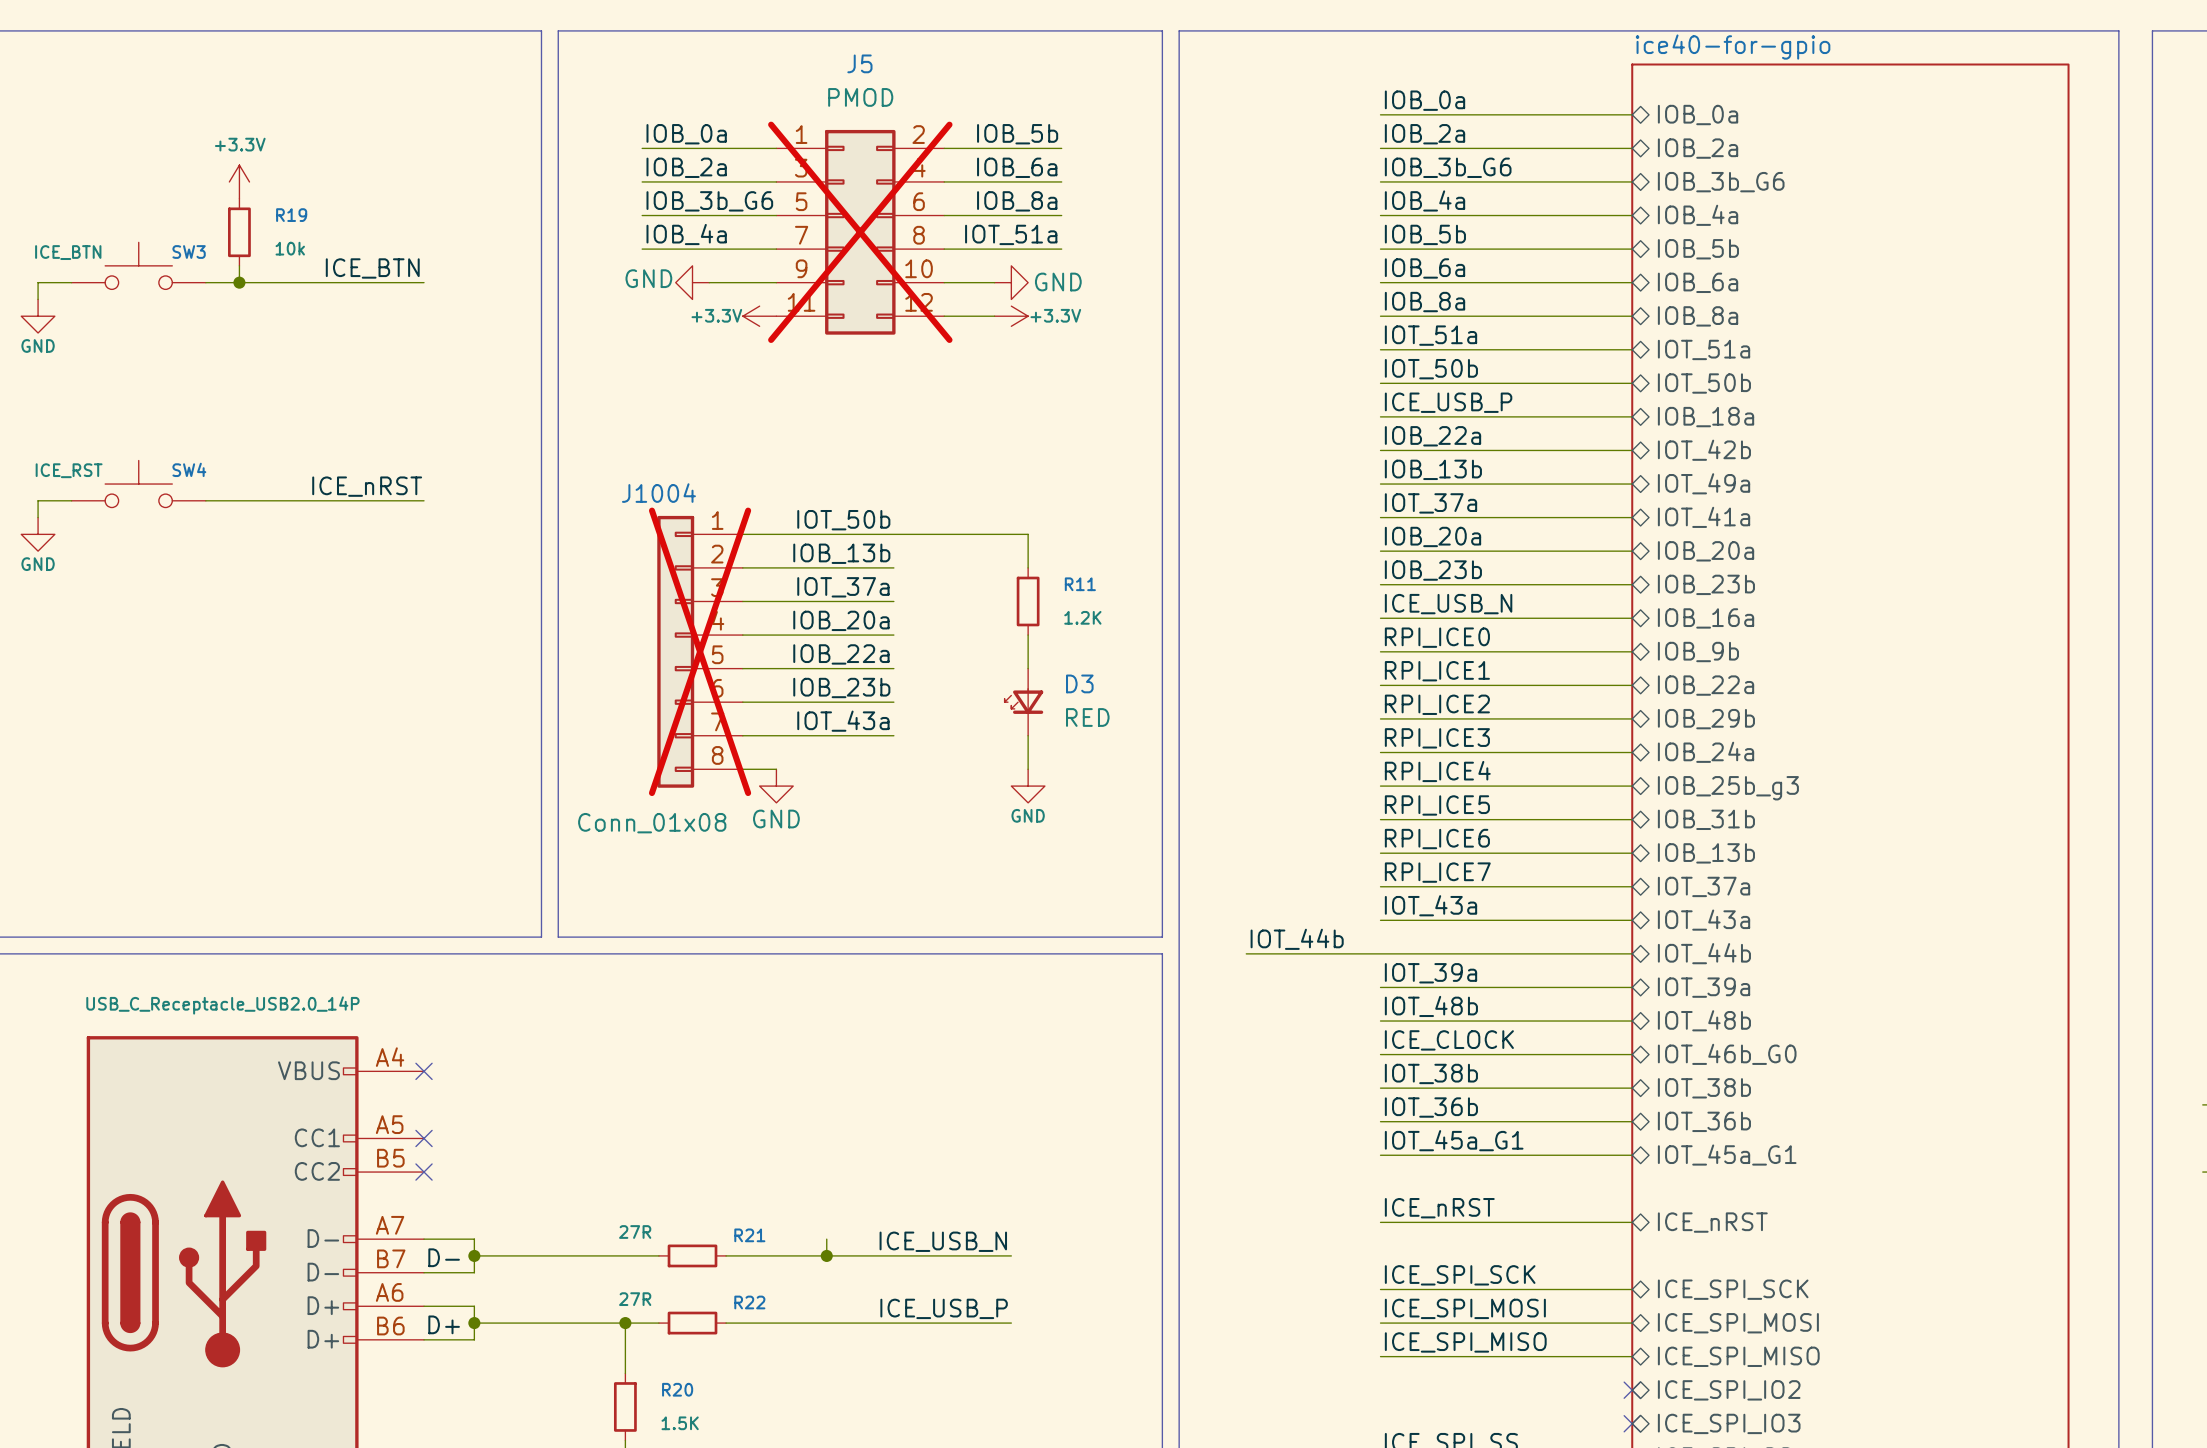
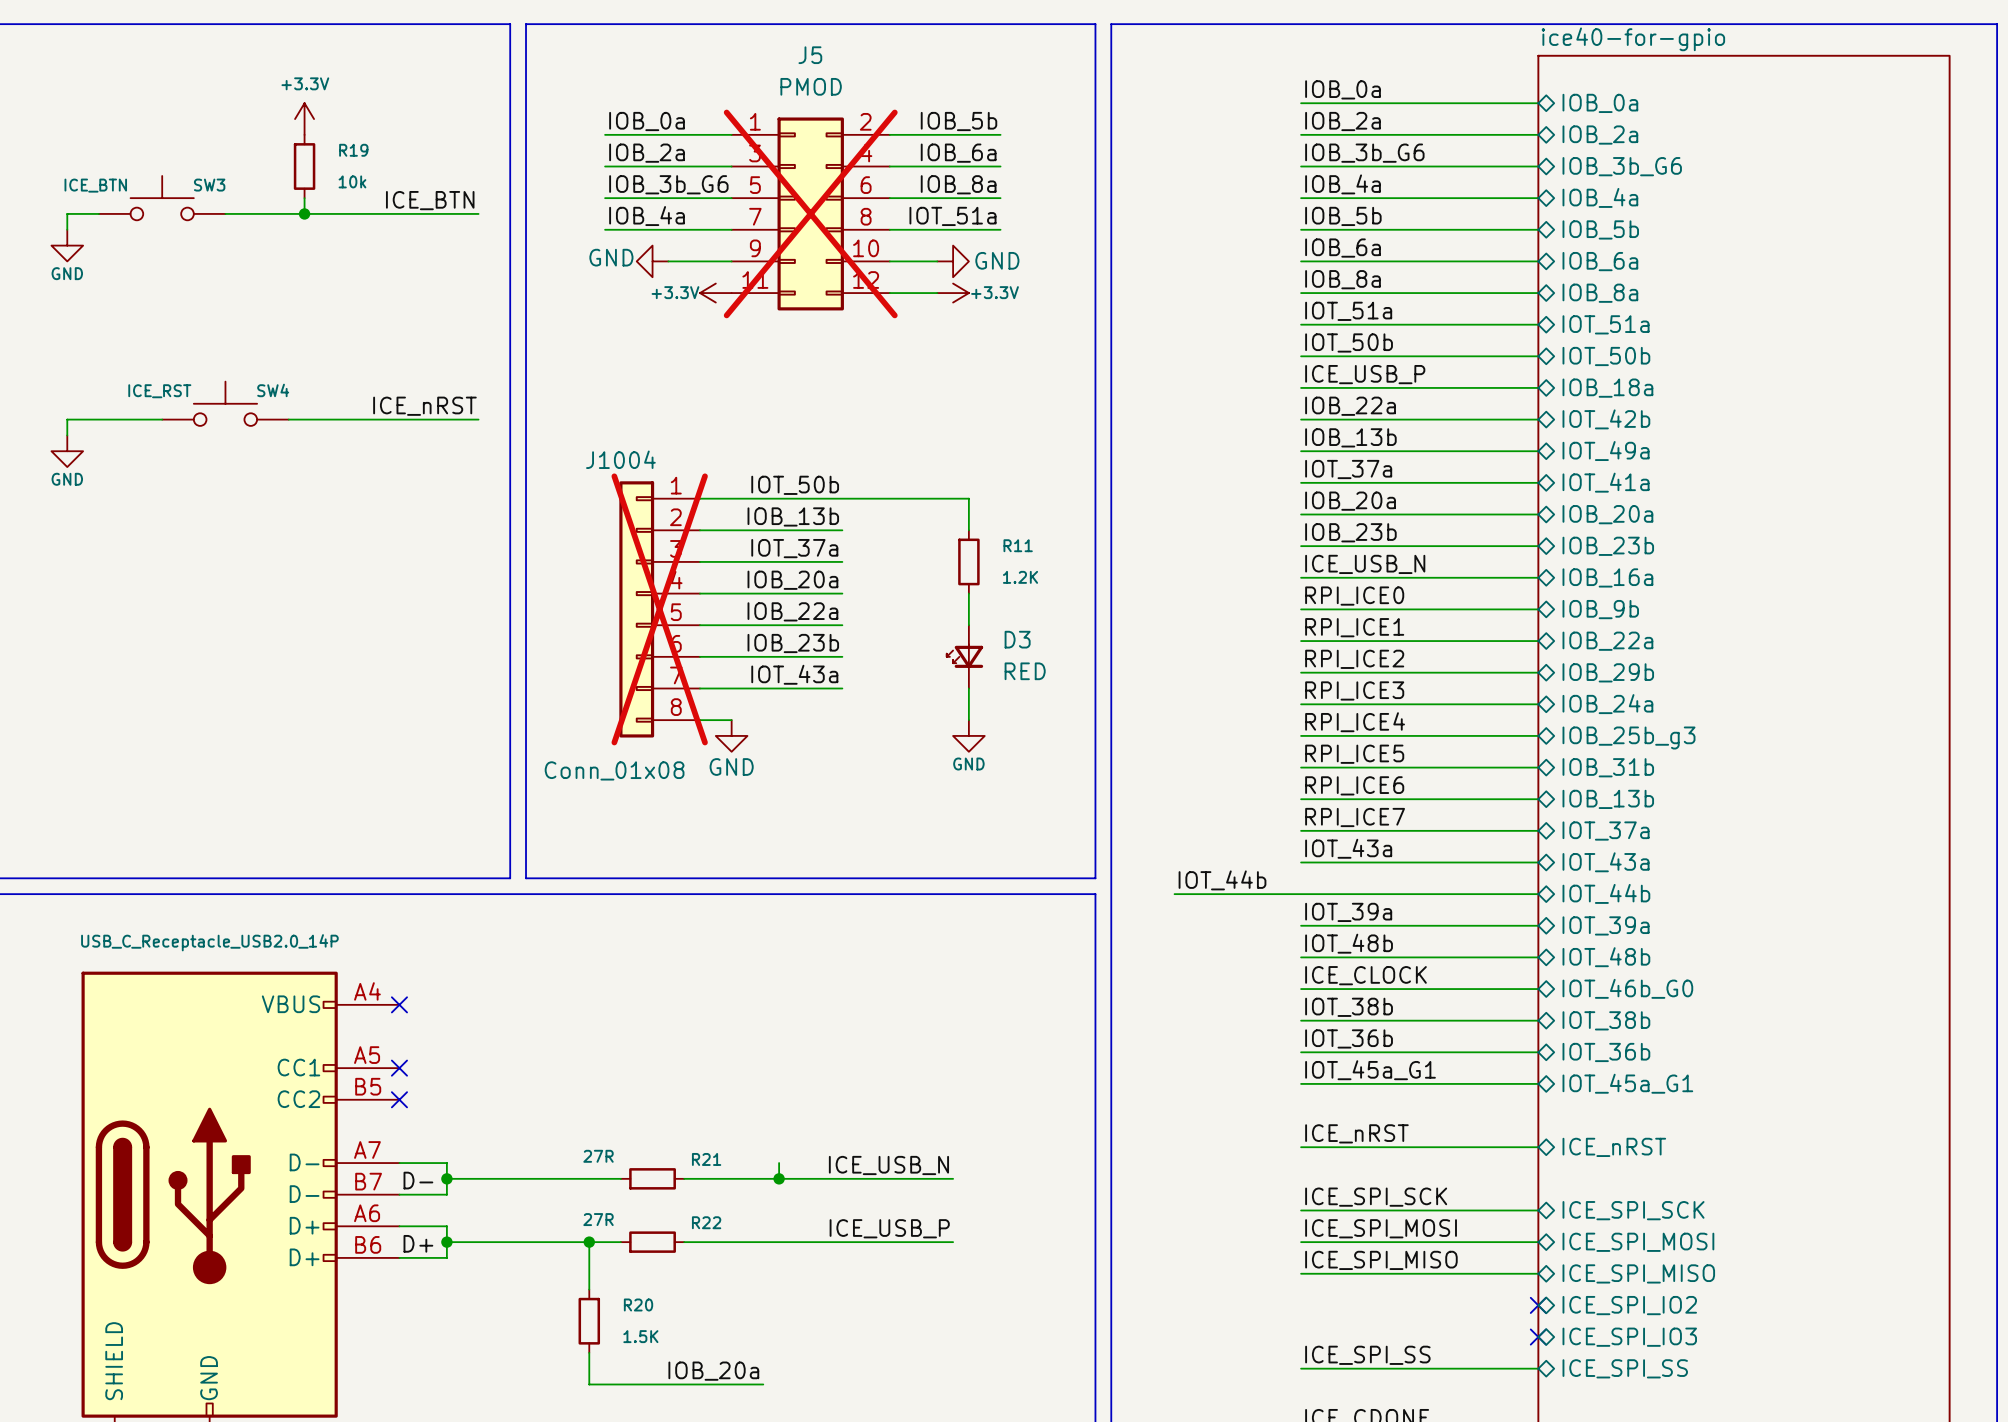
power symbol position: +3.3V (239, 181) -> +3.3V (304, 119)
wire: none -> (225, 213) (478, 213)
R19 position: (239, 232) -> (304, 166)
junction: none -> (304, 213)
SW3 position: (138, 265) -> (162, 198)
wire: (239, 265) (239, 282) -> (304, 198) (304, 213)
label position: ICE_BTN (372, 268) -> ICE_BTN (430, 200)
wire: (71, 282) (38, 282) (38, 299) -> (98, 213) (67, 213) (67, 229)
wire: (205, 282) (424, 282) -> none
junction: (239, 282) -> none
power symbol position: GND (38, 316) -> GND (67, 245)
wire: none -> (162, 419) (67, 419) (67, 435)
wire: none -> (288, 419) (478, 419)
SW4 position: (138, 484) -> (225, 403)
label position: ICE_nRST (367, 486) -> ICE_nRST (424, 406)
wire: (71, 500) (38, 500) (38, 517) -> none
wire: (205, 500) (424, 500) -> none
power symbol position: GND (38, 534) -> GND (67, 451)

